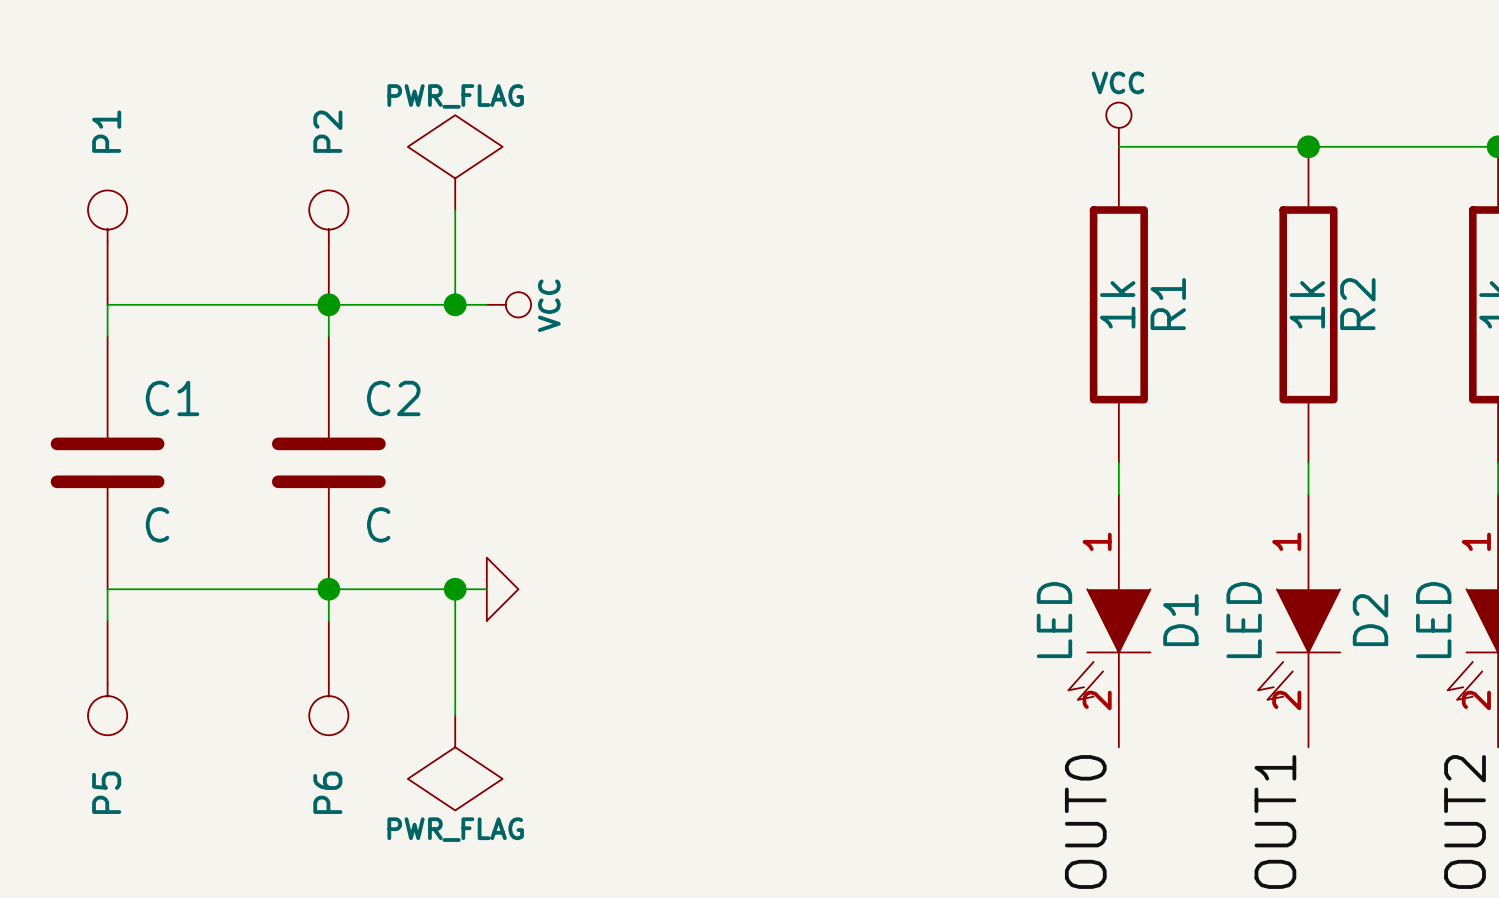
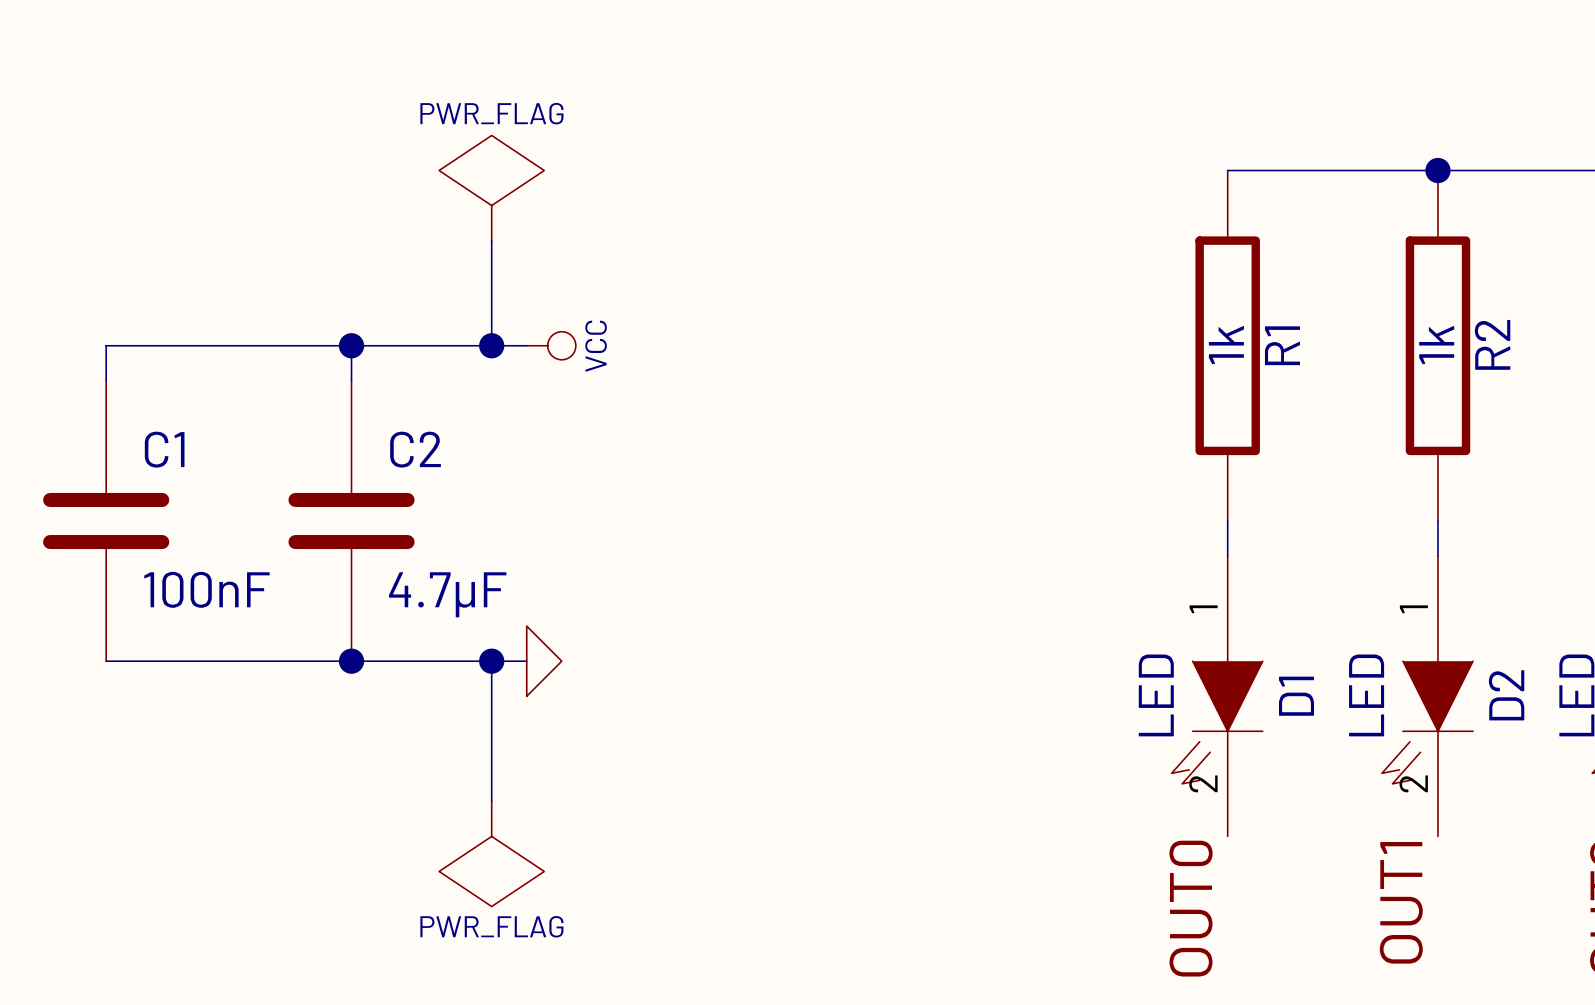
power symbol: VCC (1118, 124) -> none
P1: (107, 247) -> none
P2: (328, 247) -> none
C1 value: C (157, 524) -> 100nF (206, 589)
C2 value: C (378, 524) -> 4.7µF (447, 594)
wire: (107, 589) (107, 620) -> none
wire: (328, 589) (328, 620) -> none
P5: (107, 678) -> none
P6: (328, 678) -> none

